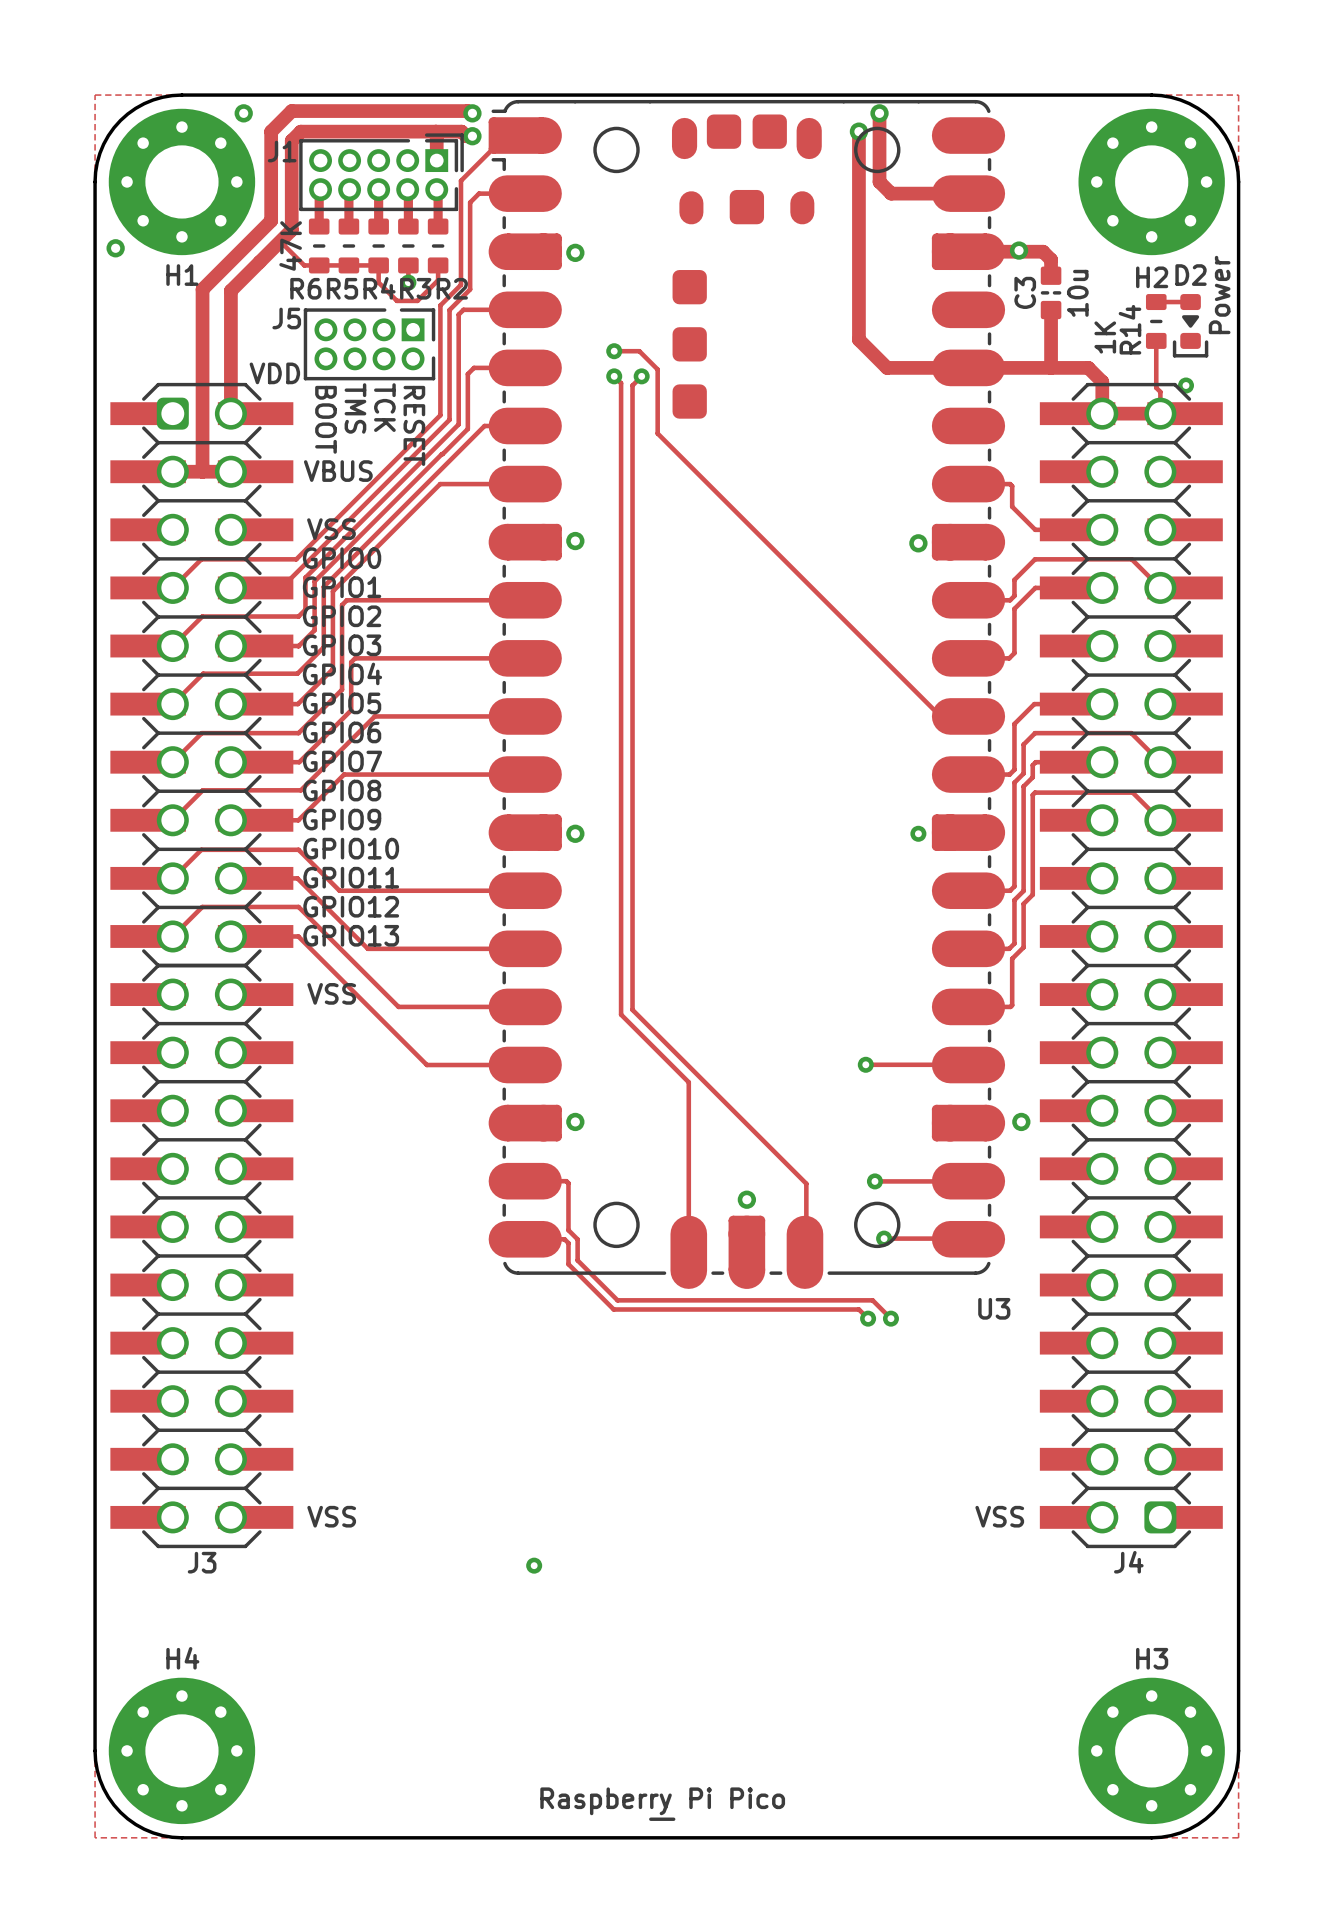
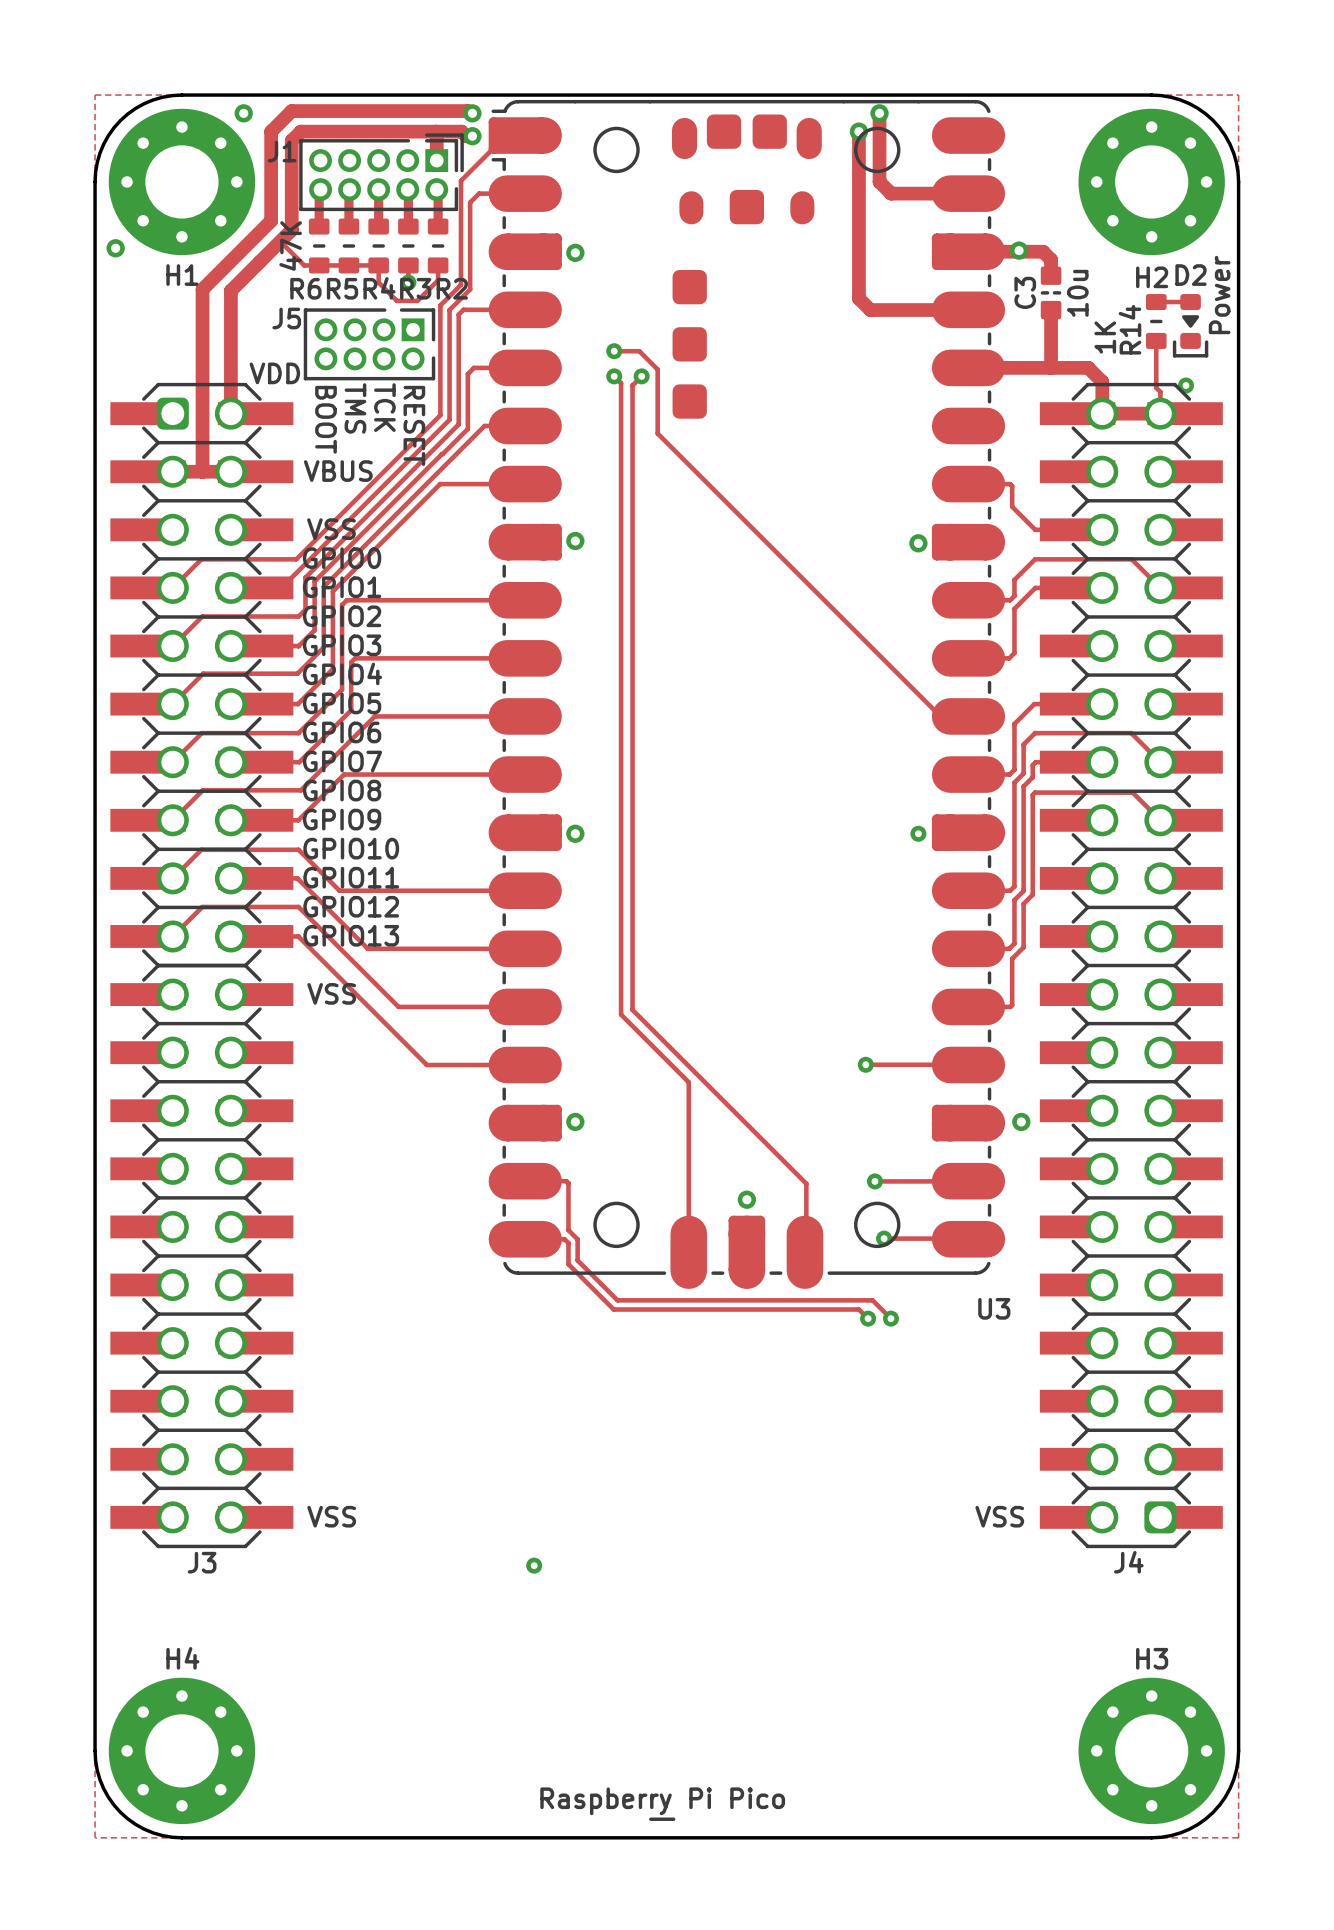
track: (858, 298) (858, 339) (887, 367) (950, 367) -> (858, 298) (870, 310) (949, 310)

